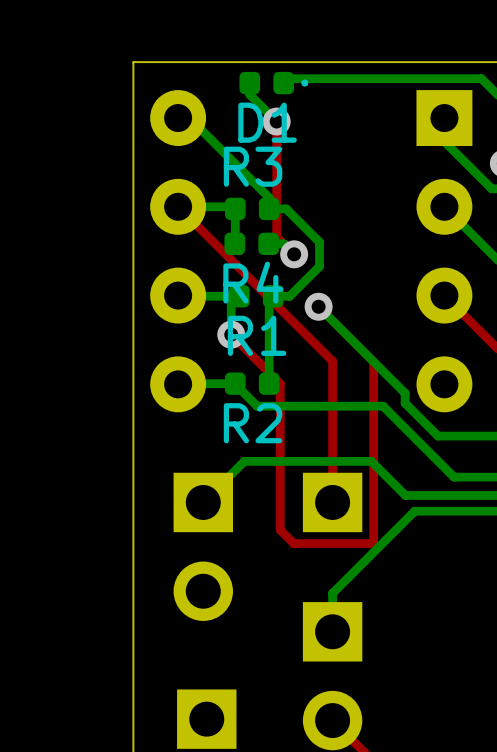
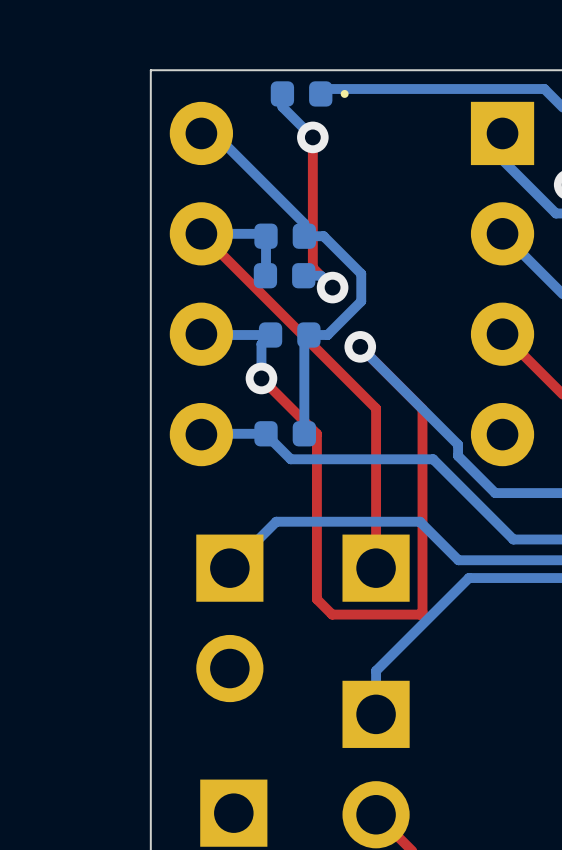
D1 name: D1 (267, 122) -> none
R3 name: R3 (253, 166) -> none
R4 name: R4 (253, 282) -> none
R1 name: R1 (257, 335) -> none
R2 name: R2 (253, 423) -> none

